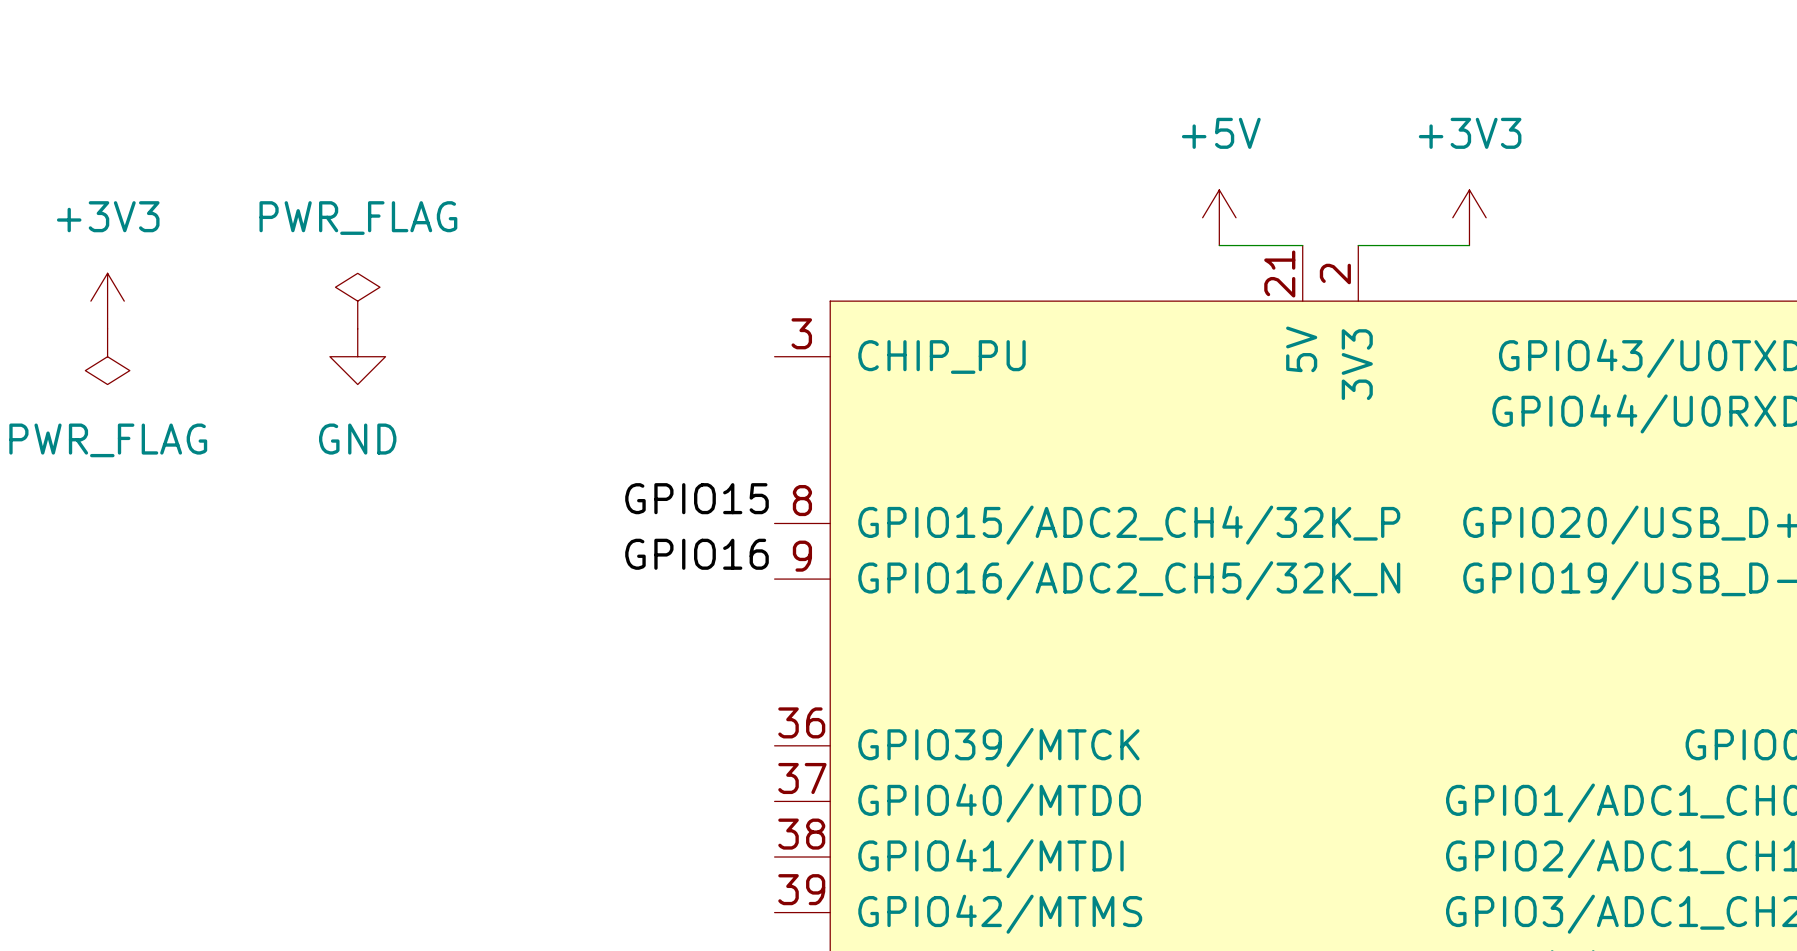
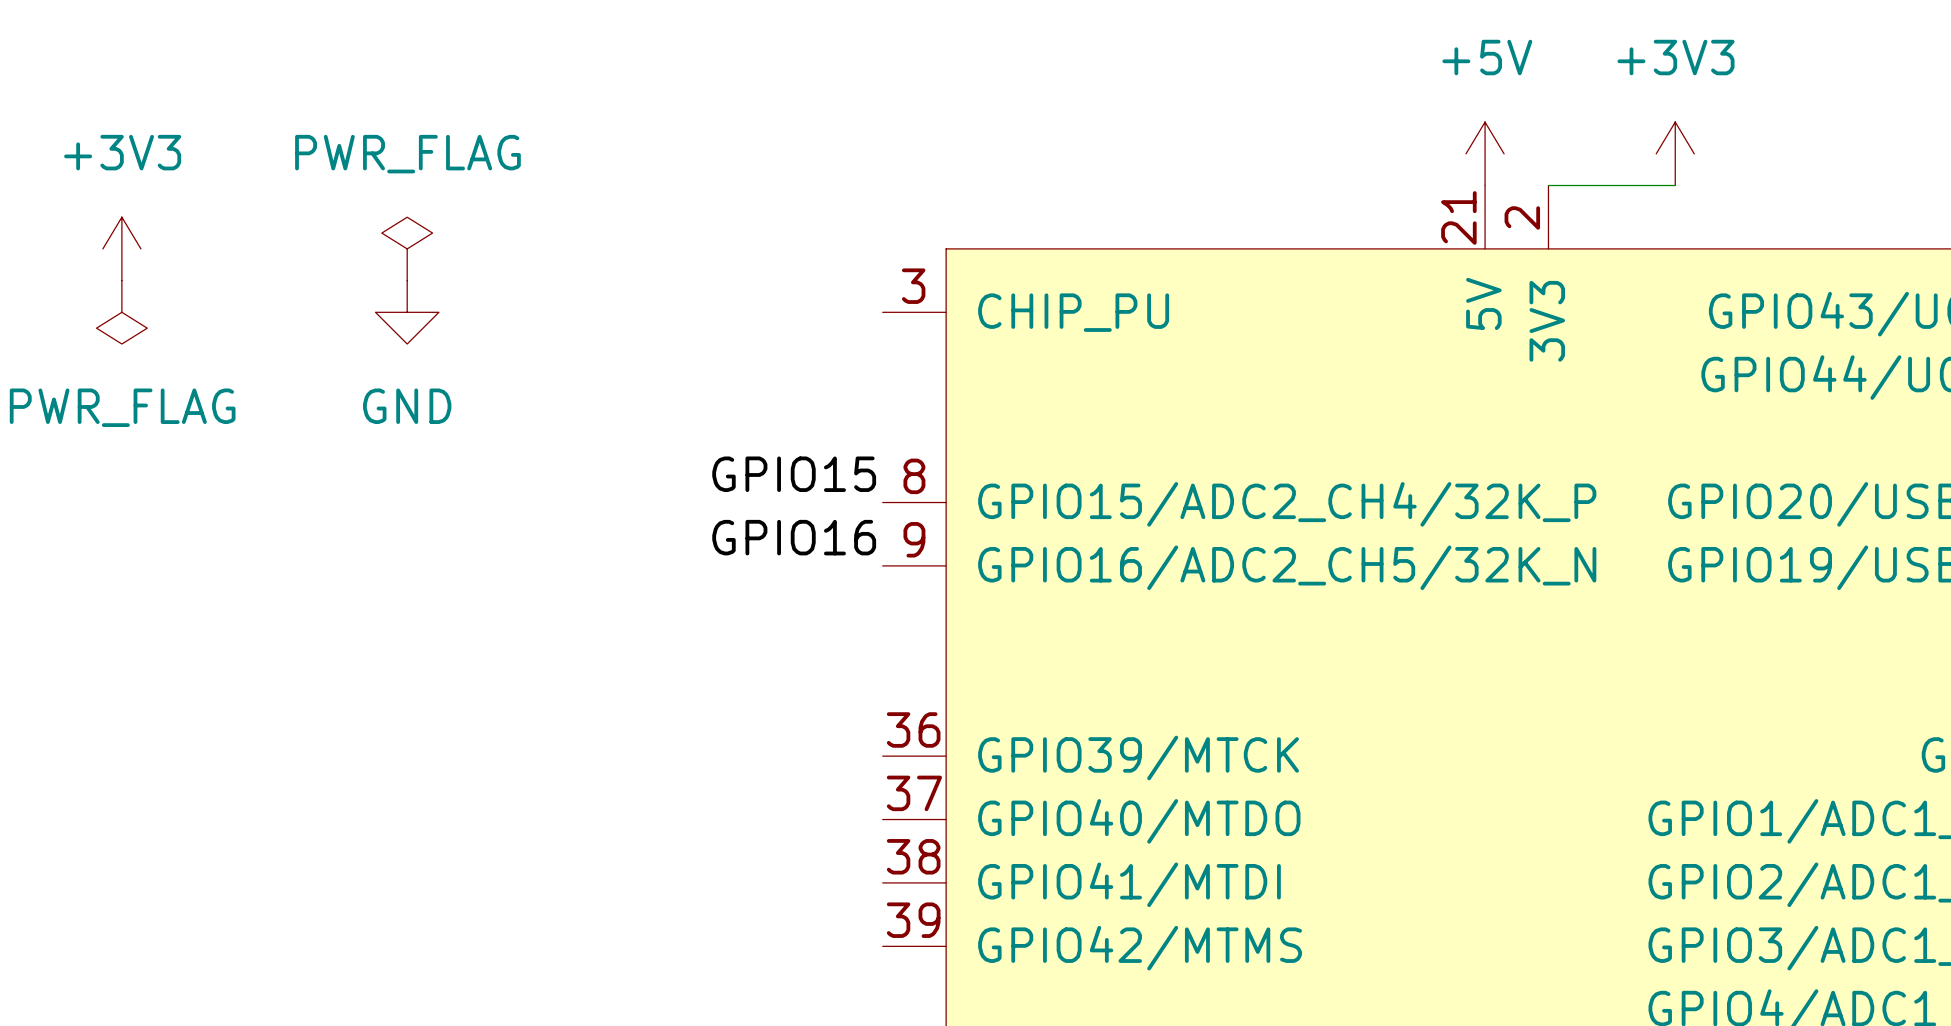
power symbol position: +5V (1219, 217) -> +5V (1485, 153)
wire: (1219, 245) (1302, 245) -> none

